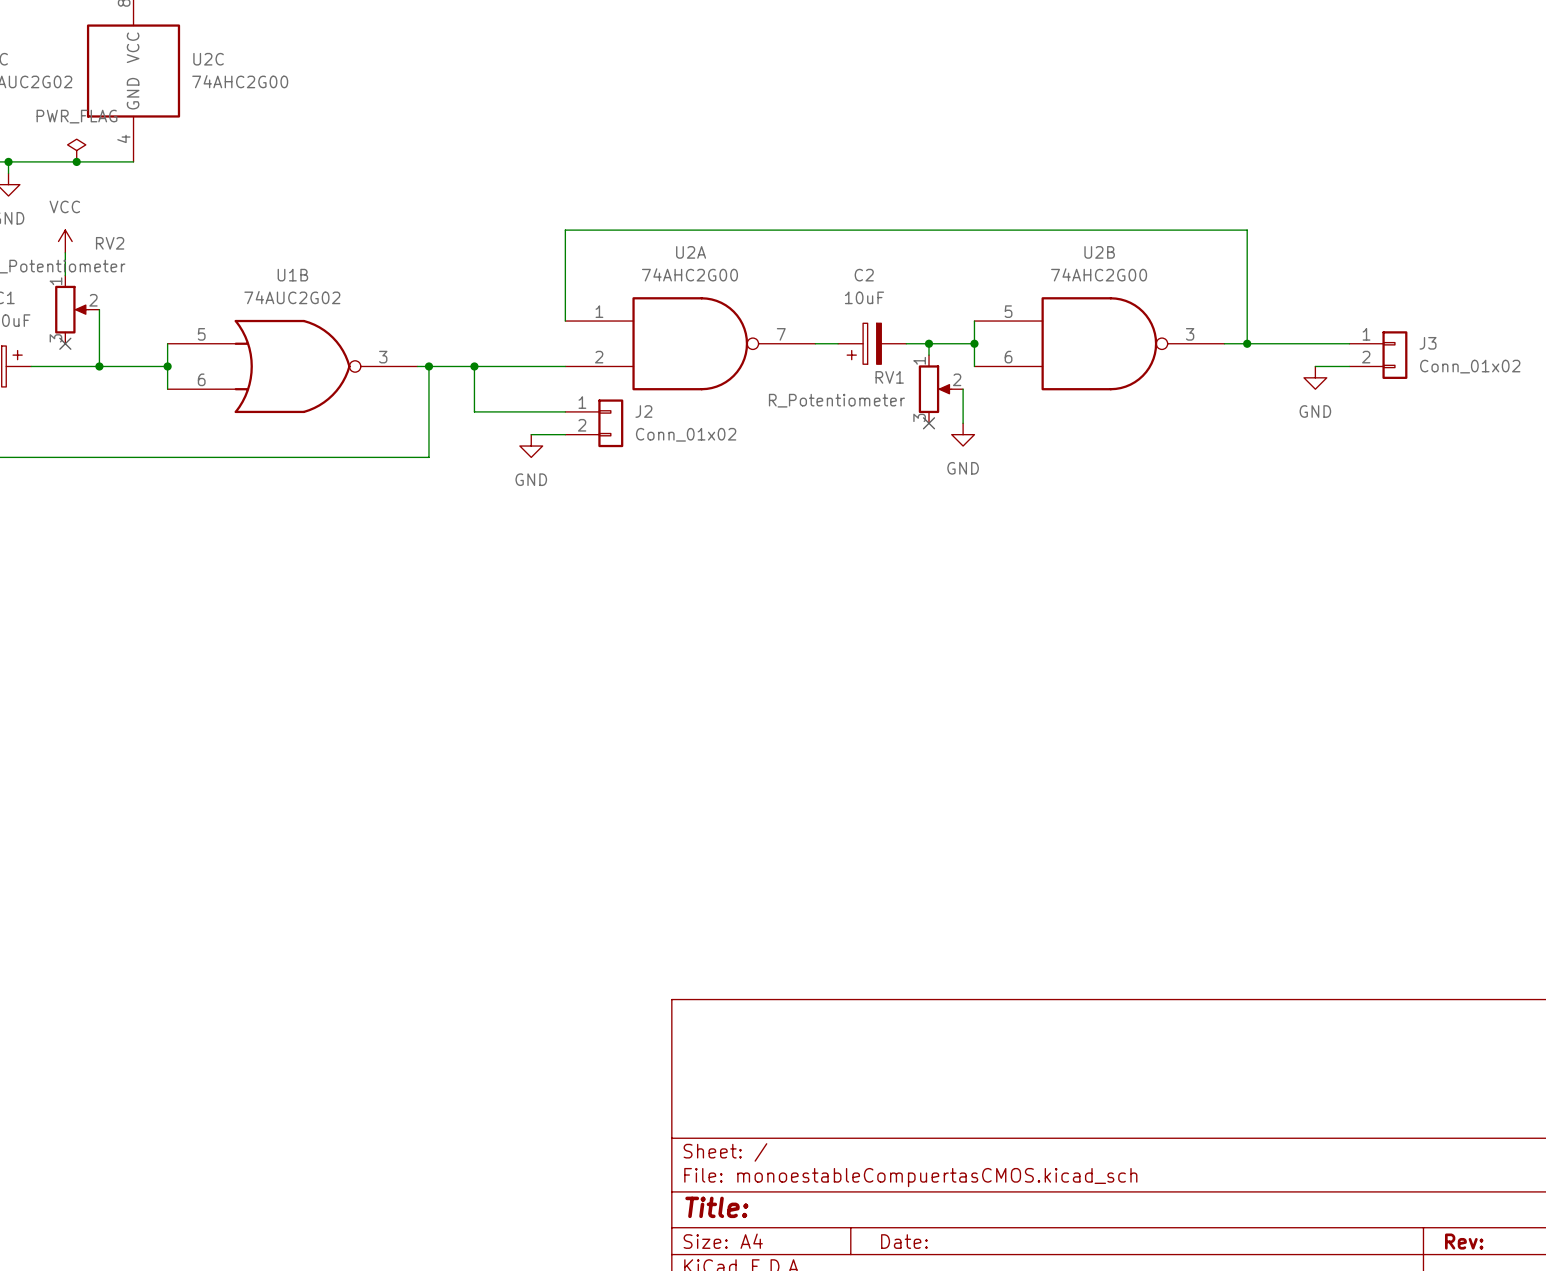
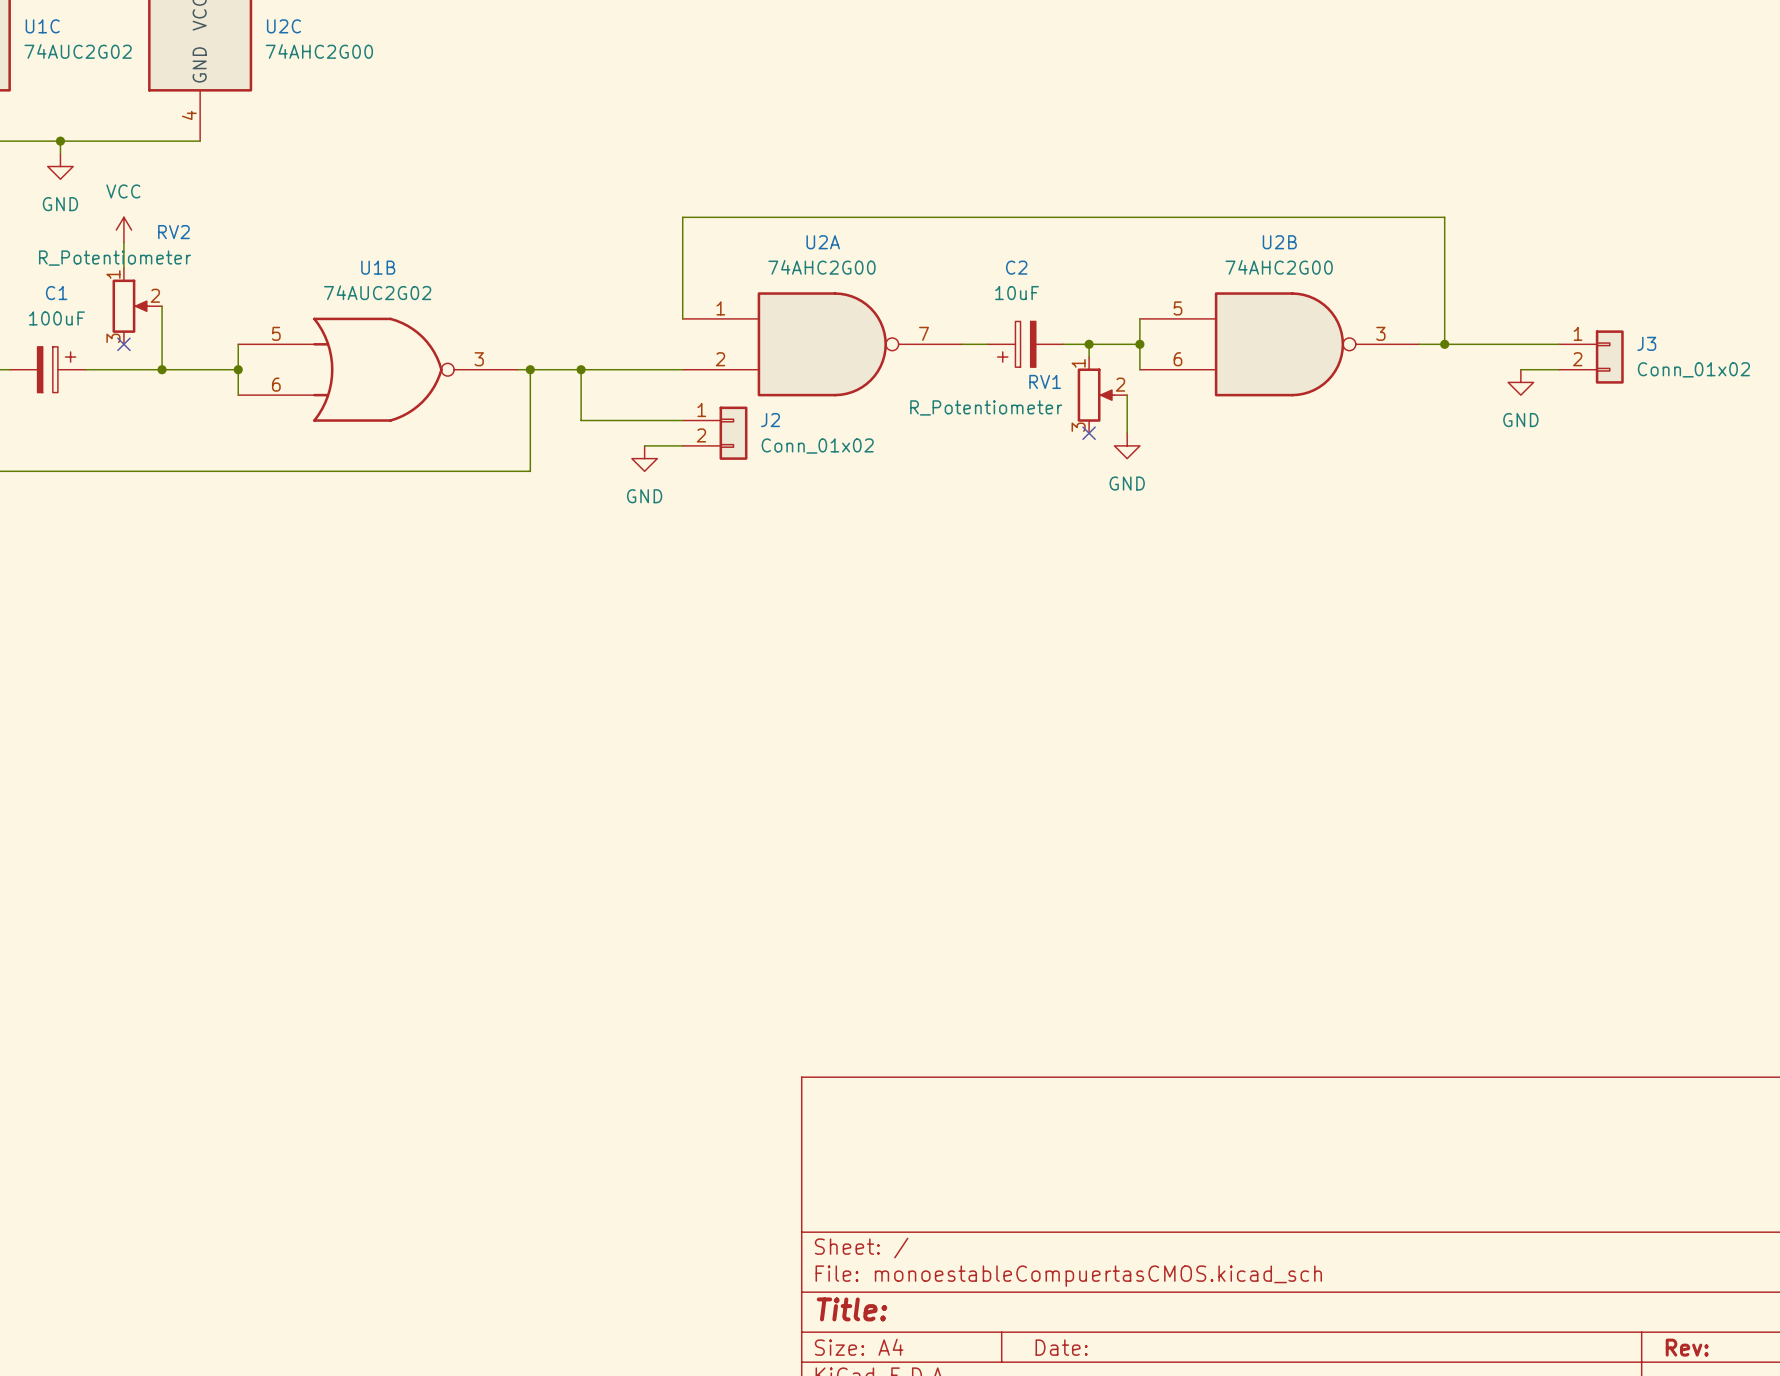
power symbol: PWR_FLAG (76, 150) -> none
junction: (76, 161) -> none

